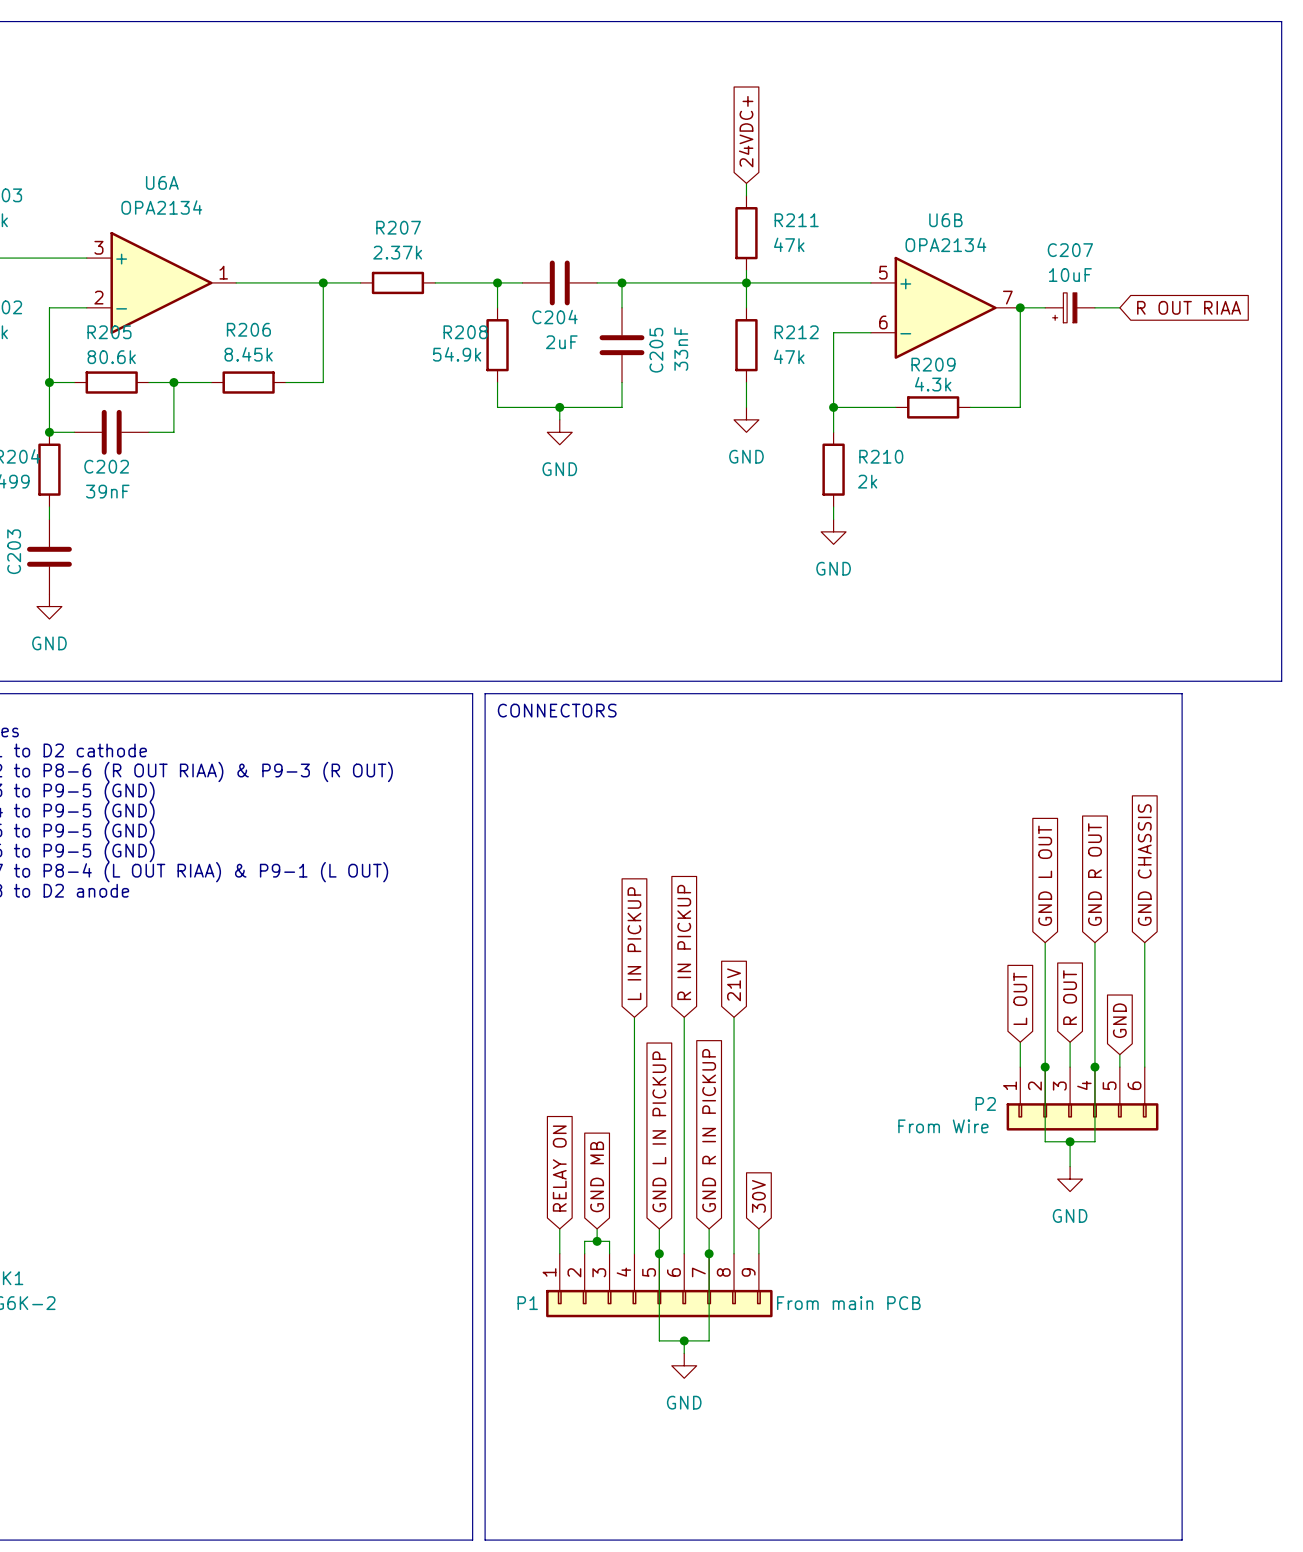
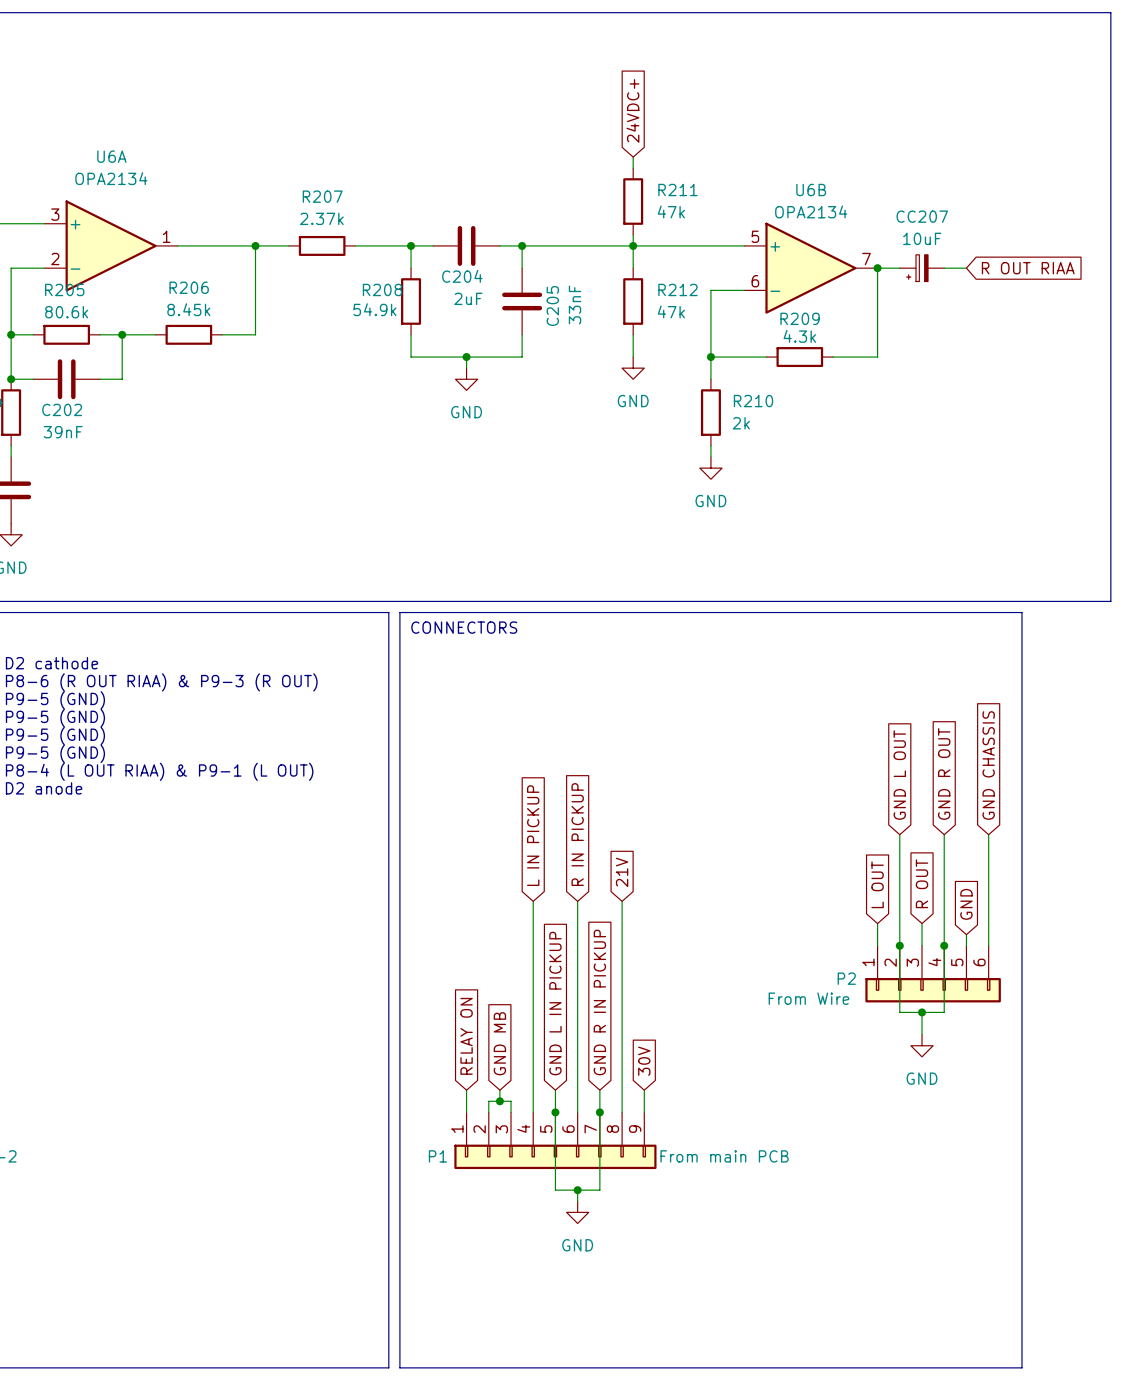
C207 name: C207 (1070, 250) -> CC207 (922, 216)

